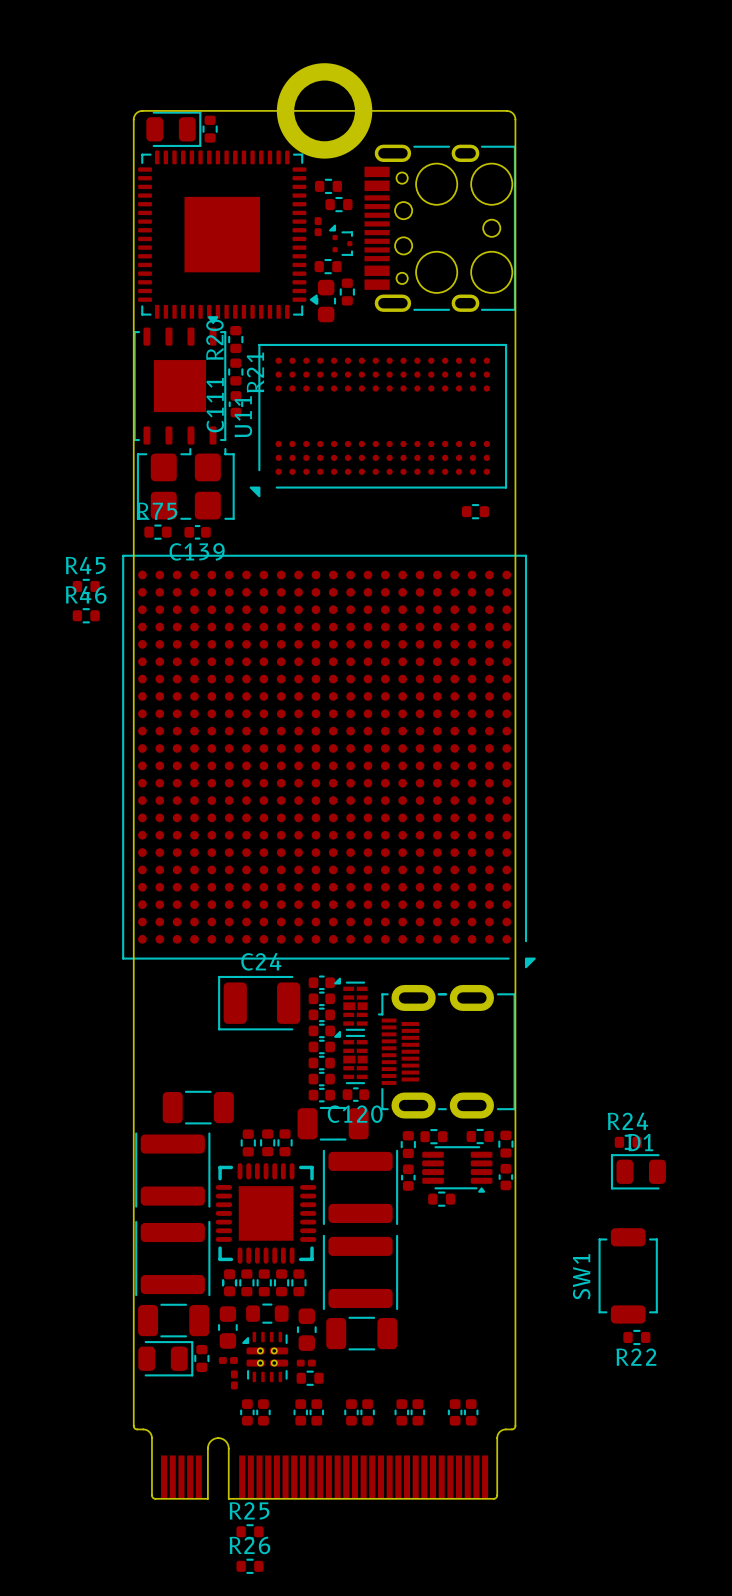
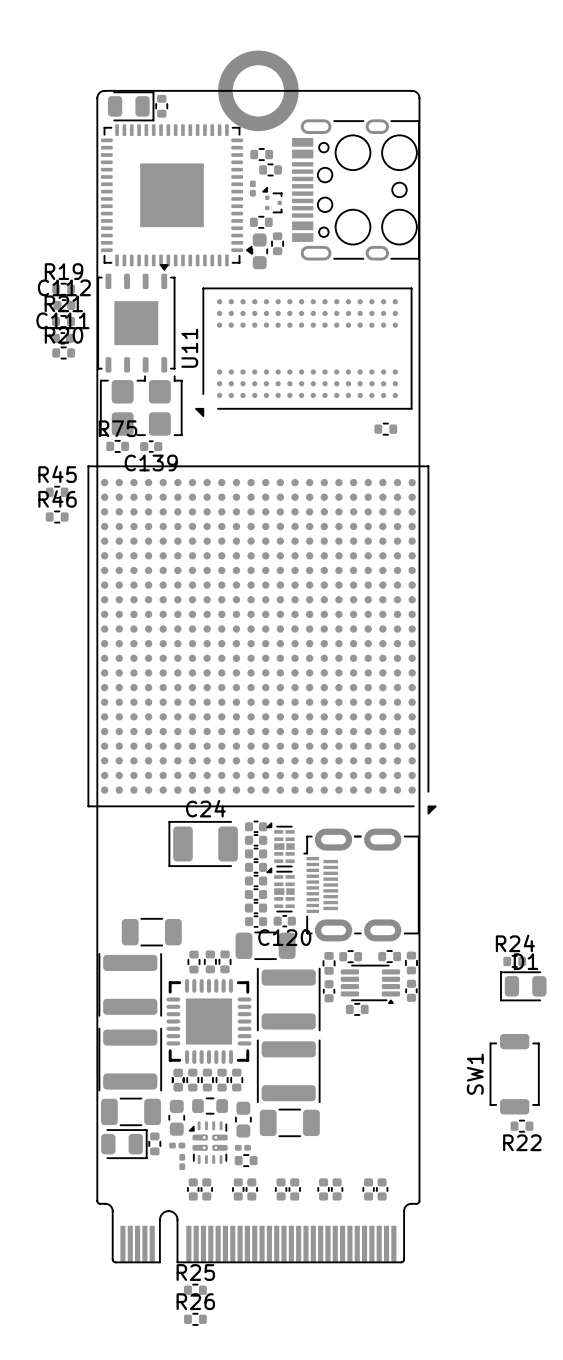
R20 rotation: 0° (235, 339) -> 90° clockwise (63, 352)
R20 position: (235, 339) -> (63, 352)
R19: none -> (63, 289)
C112: none -> (64, 305)
R21 rotation: 0° (235, 372) -> 90° clockwise (63, 321)
R21 position: (235, 372) -> (63, 321)
C111 rotation: 0° (235, 404) -> 90° clockwise (62, 338)
C111 position: (235, 404) -> (62, 338)

